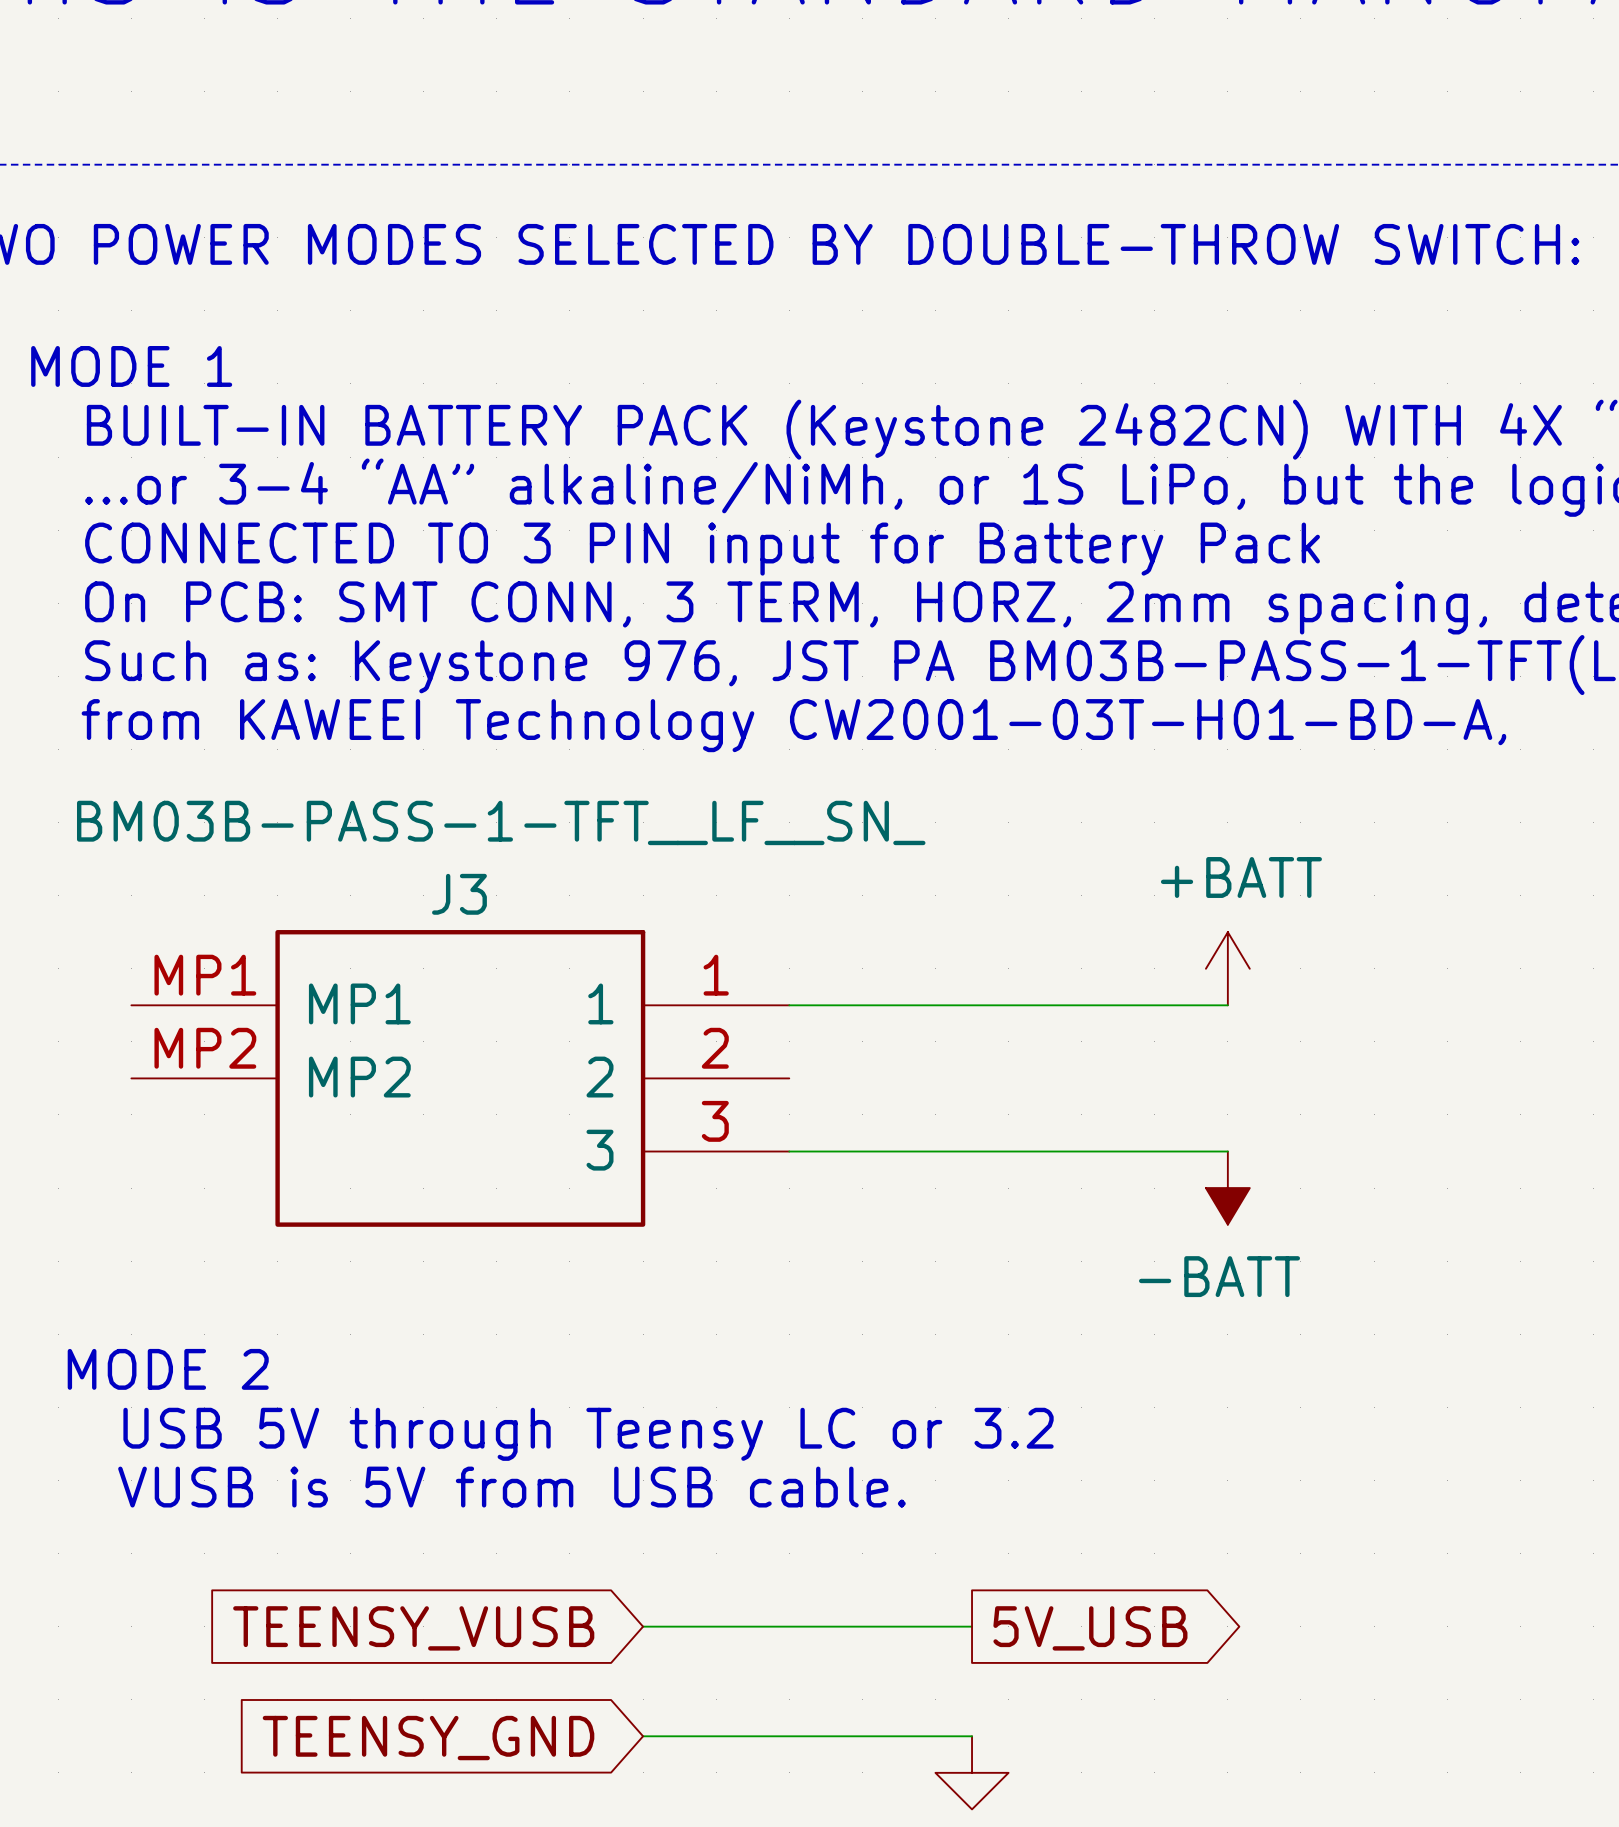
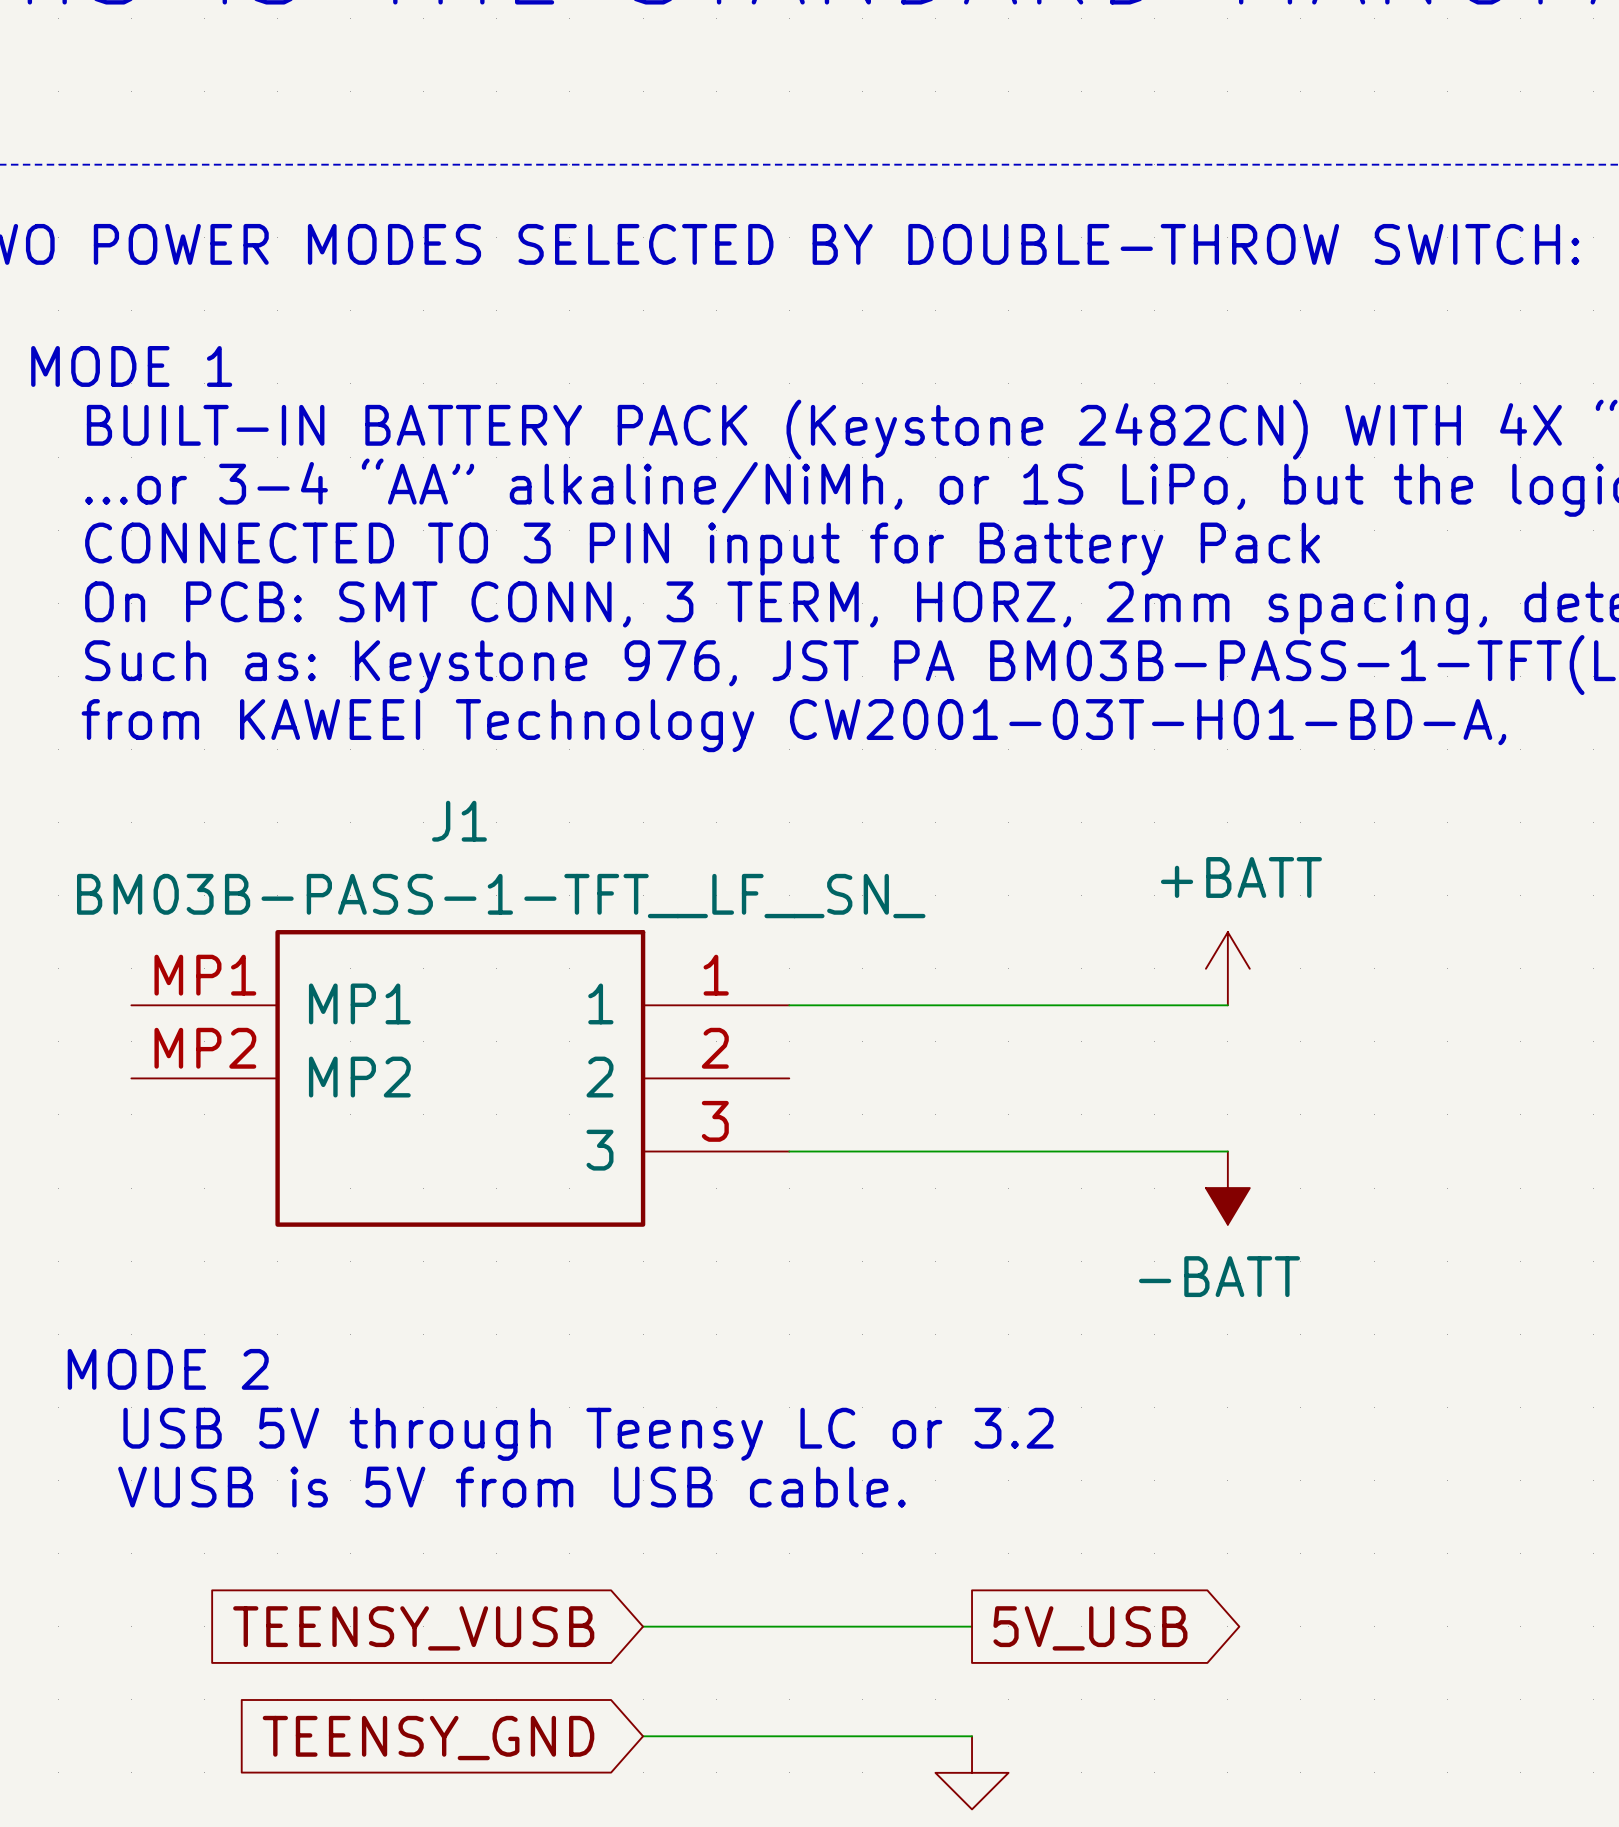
J3 value position: BM03B-PASS-1-TFT__LF__SN_ (501, 822) -> BM03B-PASS-1-TFT__LF__SN_ (501, 896)
J3 name: J3 (459, 894) -> J1 (459, 821)

